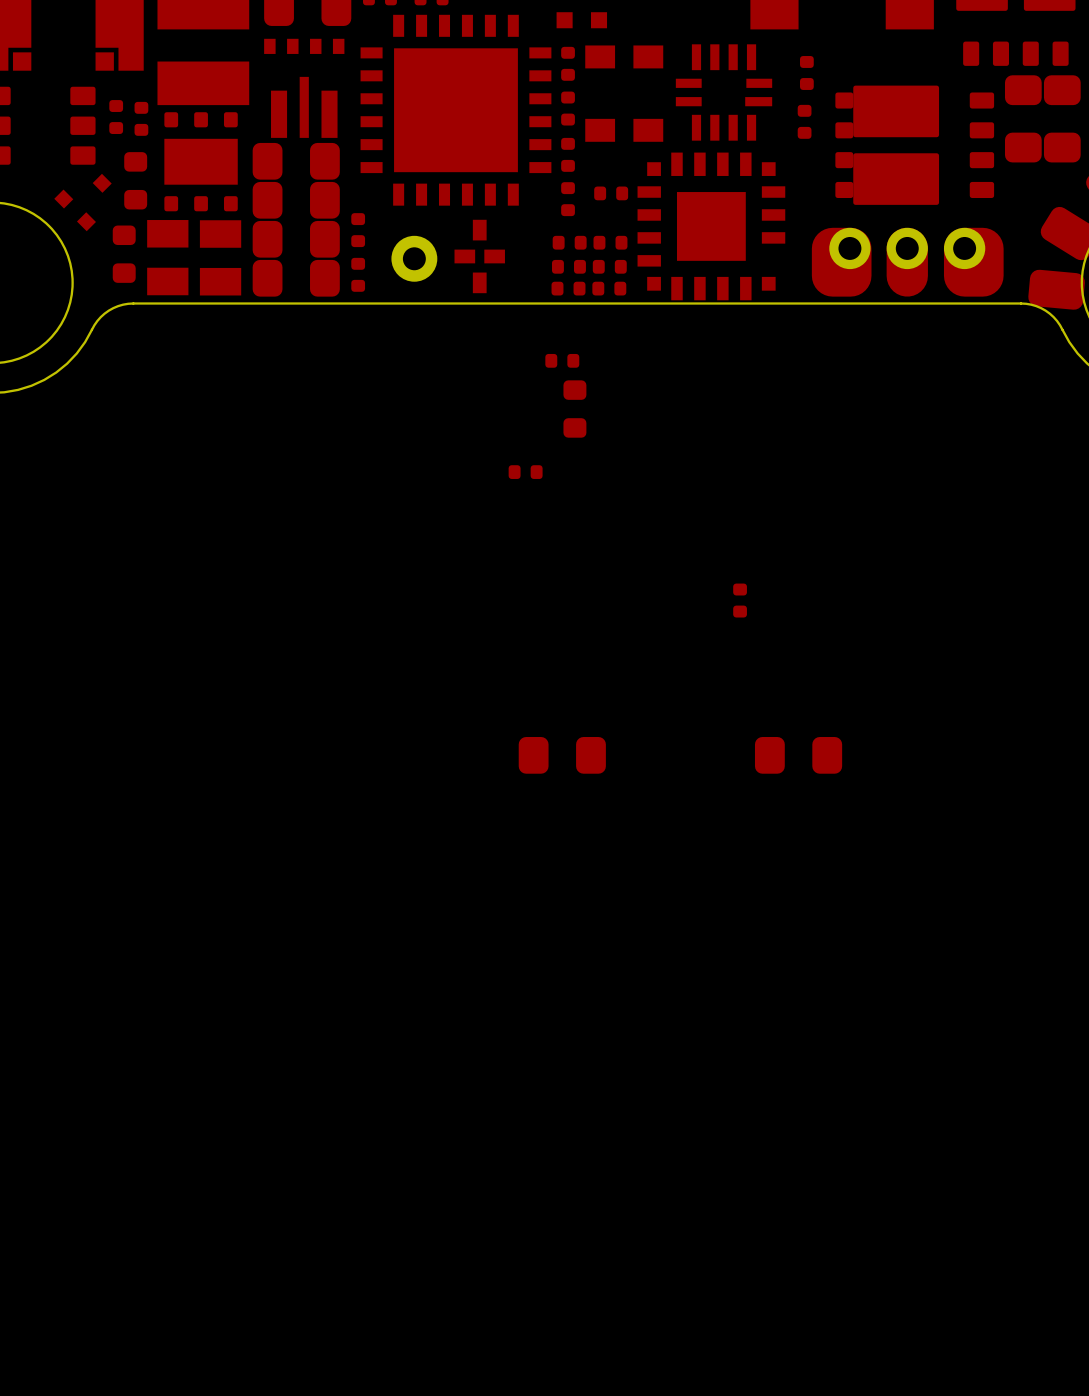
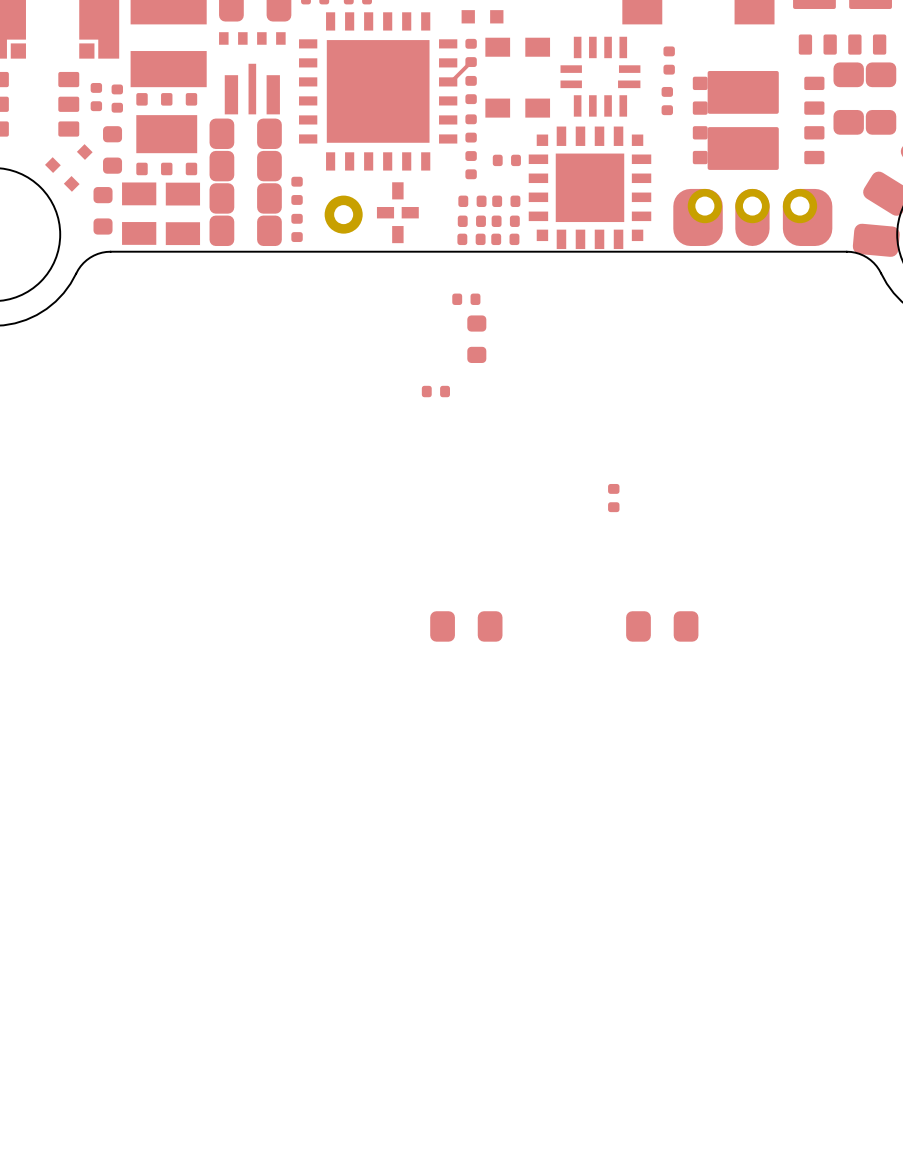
track: none -> (471, 62) (451, 81) (448, 81)
part footprint: [637, 152, 786, 301] -> [528, 126, 652, 250]

